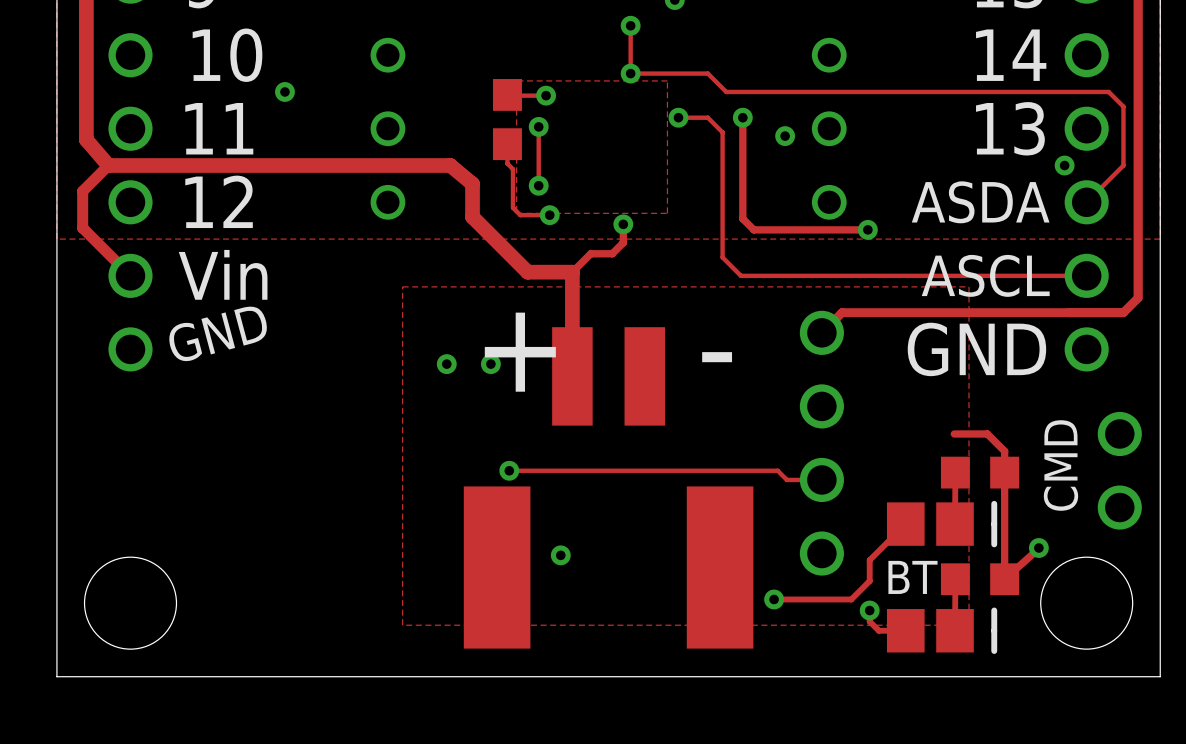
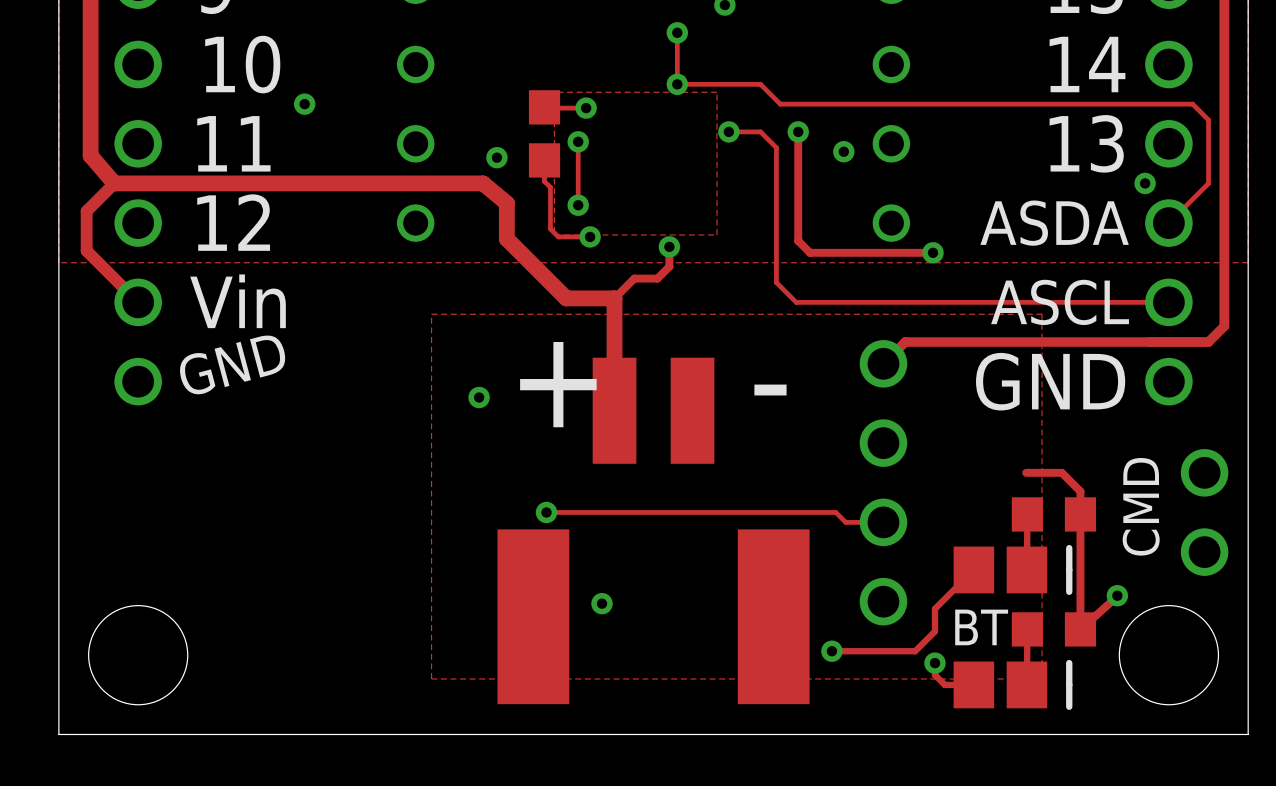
via: none -> (496, 157)
via: (490, 364) -> none

